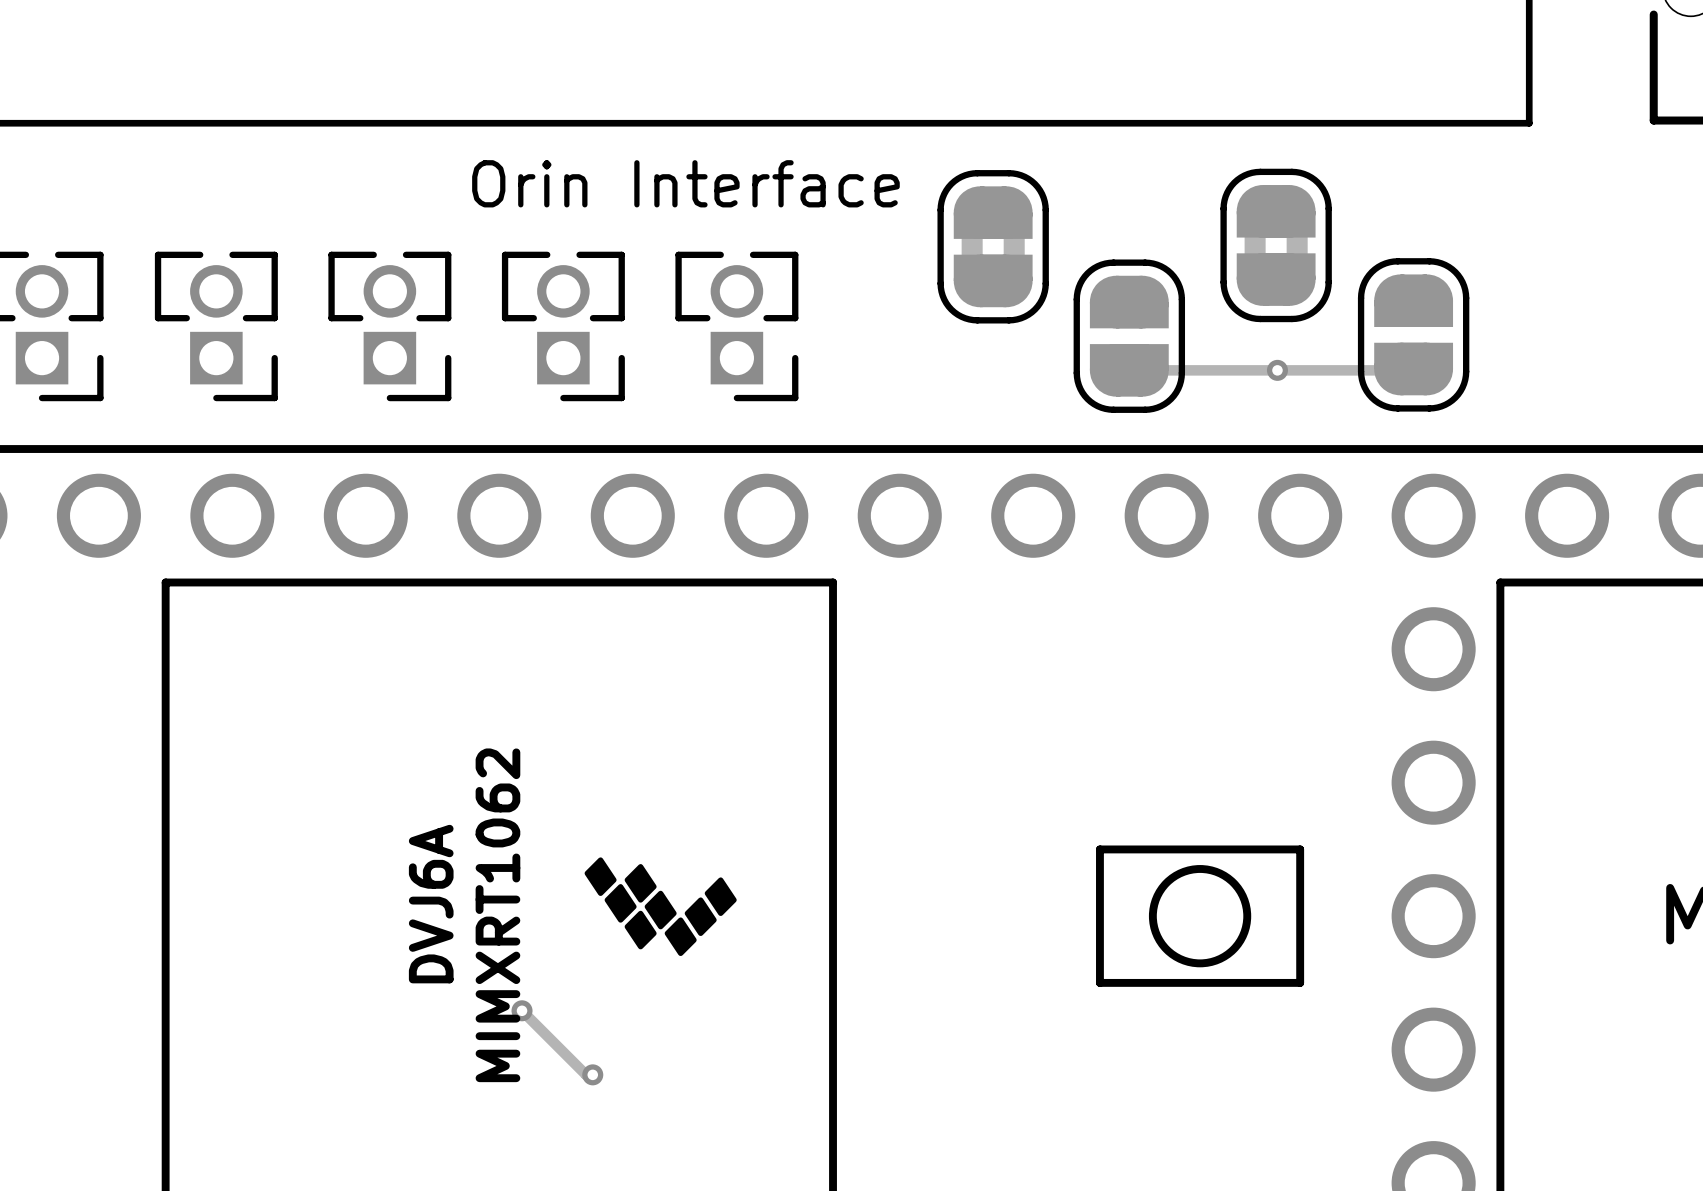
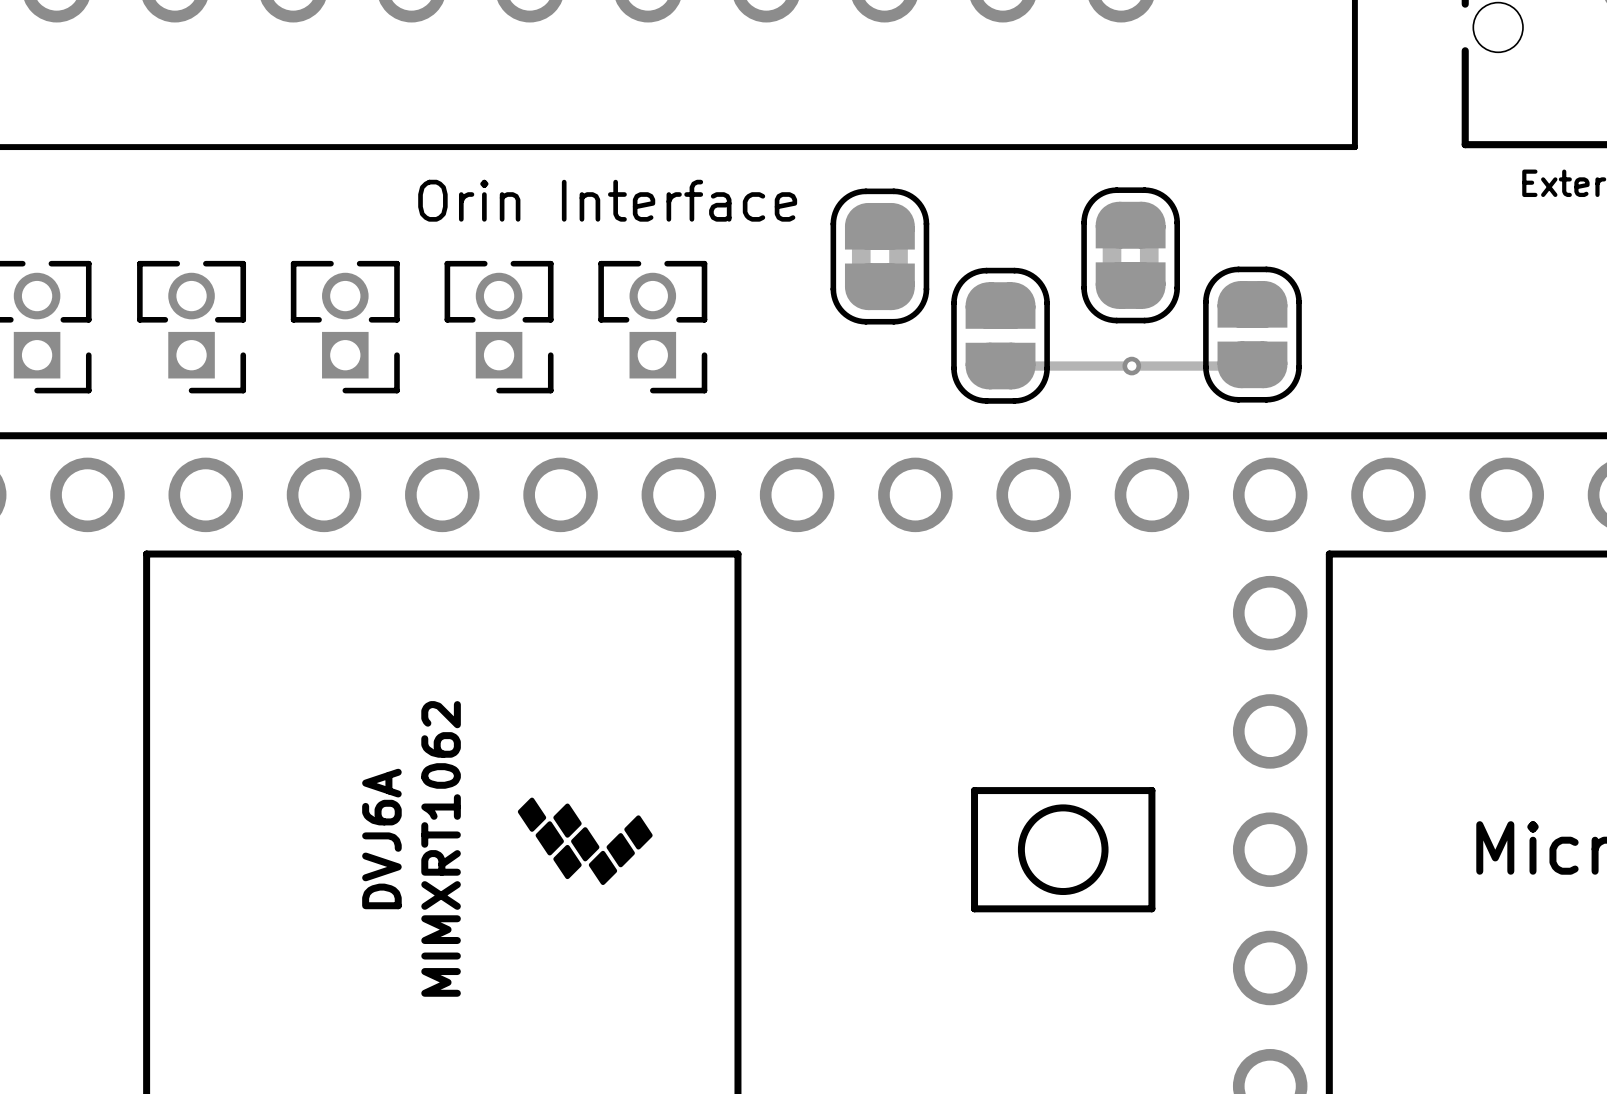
track: (522, 1010) (586, 1074) (592, 1074) -> none
via: (522, 1010) -> none
via: (592, 1074) -> none

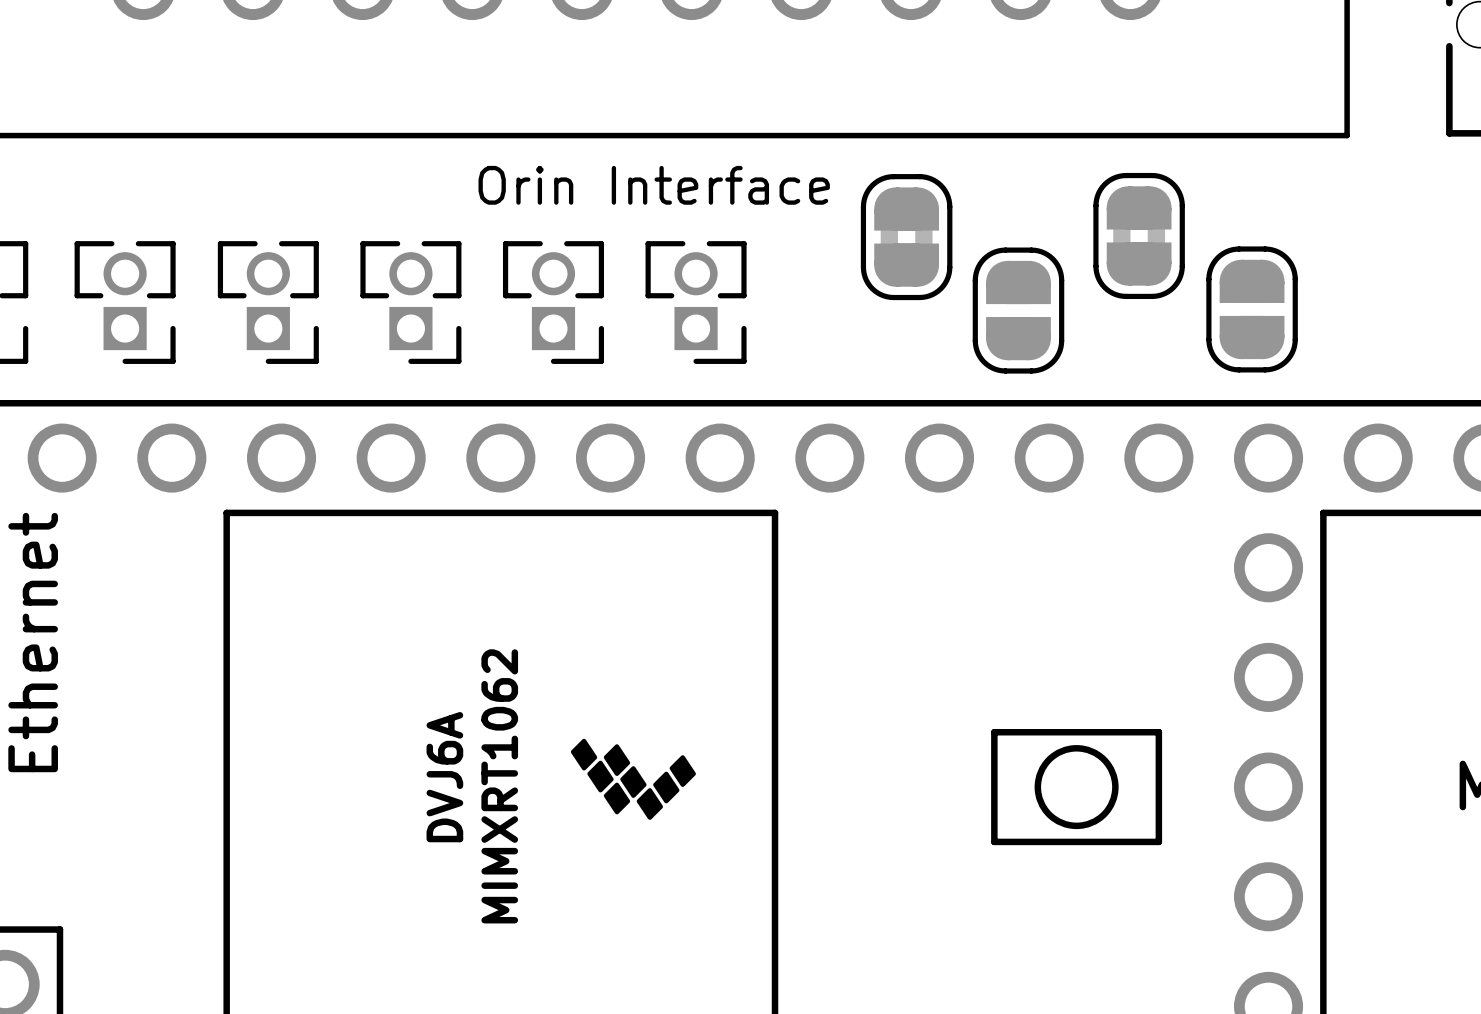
track: (1252, 364) (1000, 366) -> none
via: (1131, 366) -> none

